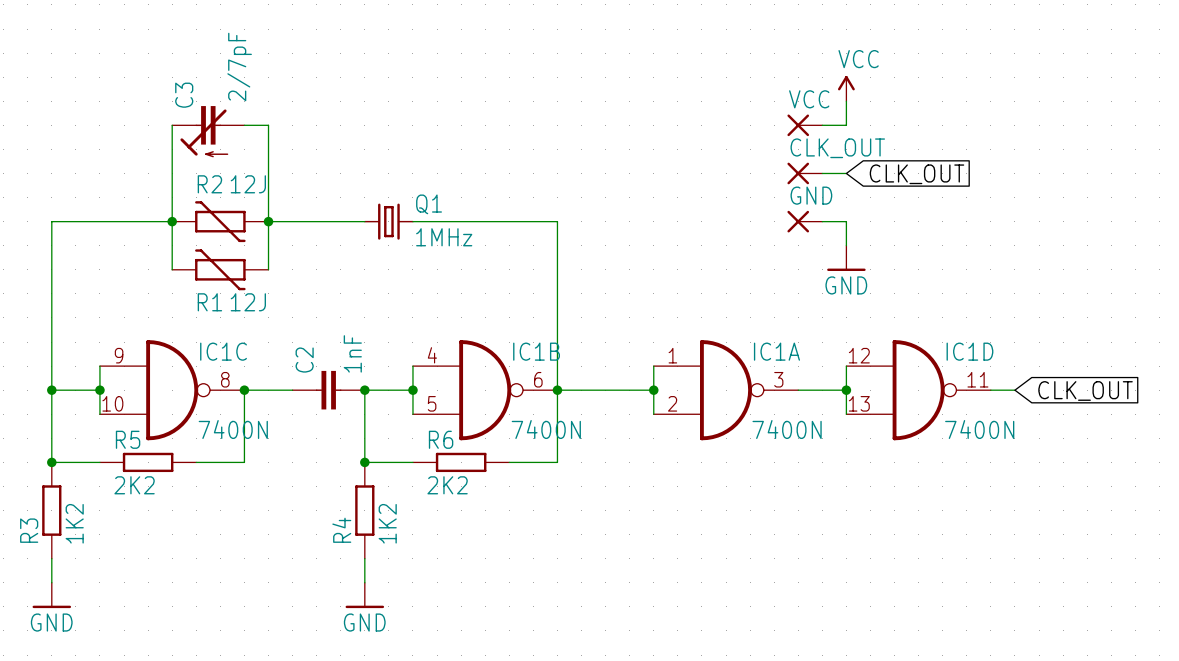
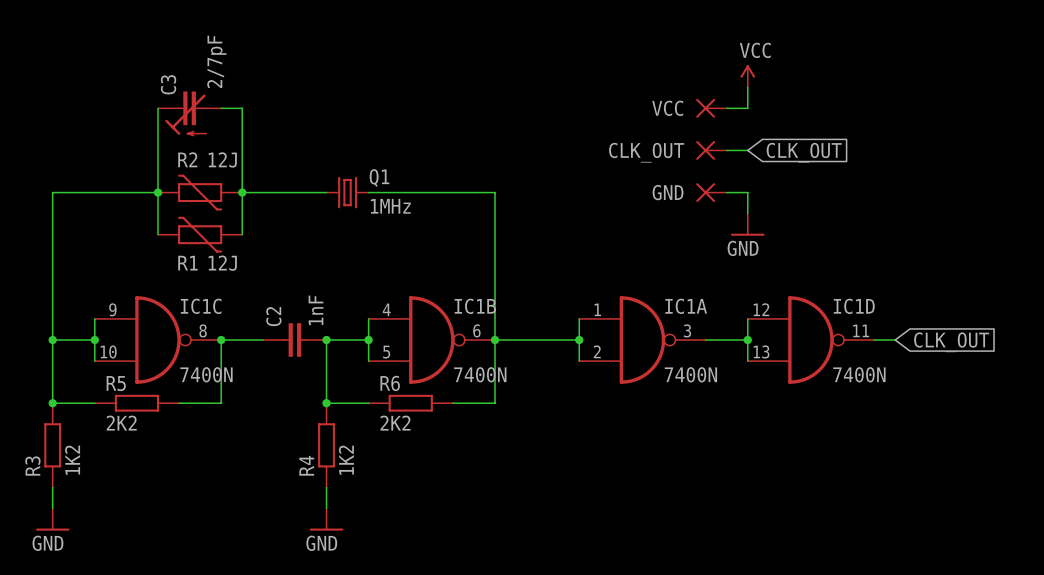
VCC name position: VCC (809, 99) -> VCC (667, 108)
CLK_OUT name position: CLK_OUT (837, 148) -> CLK_OUT (646, 152)
GND name position: GND (811, 195) -> GND (668, 192)

